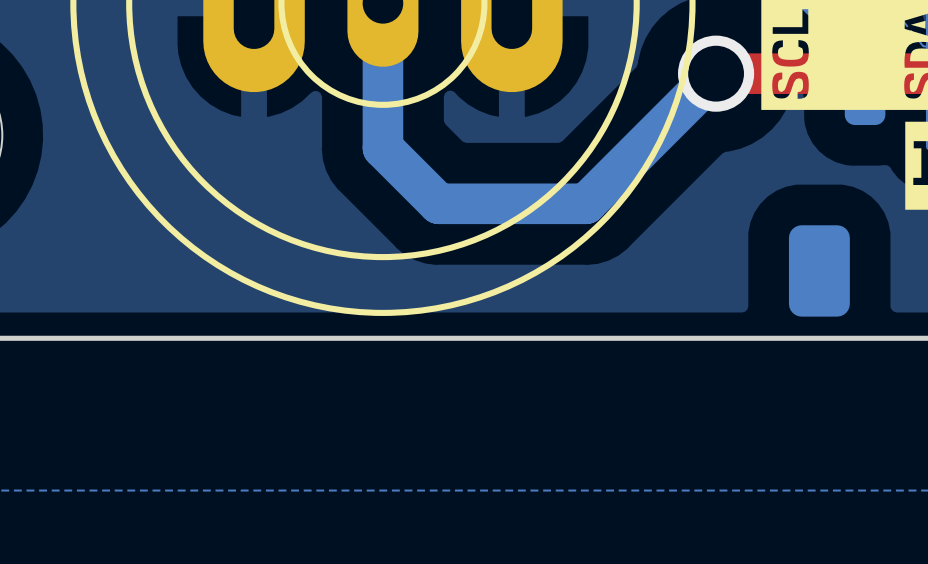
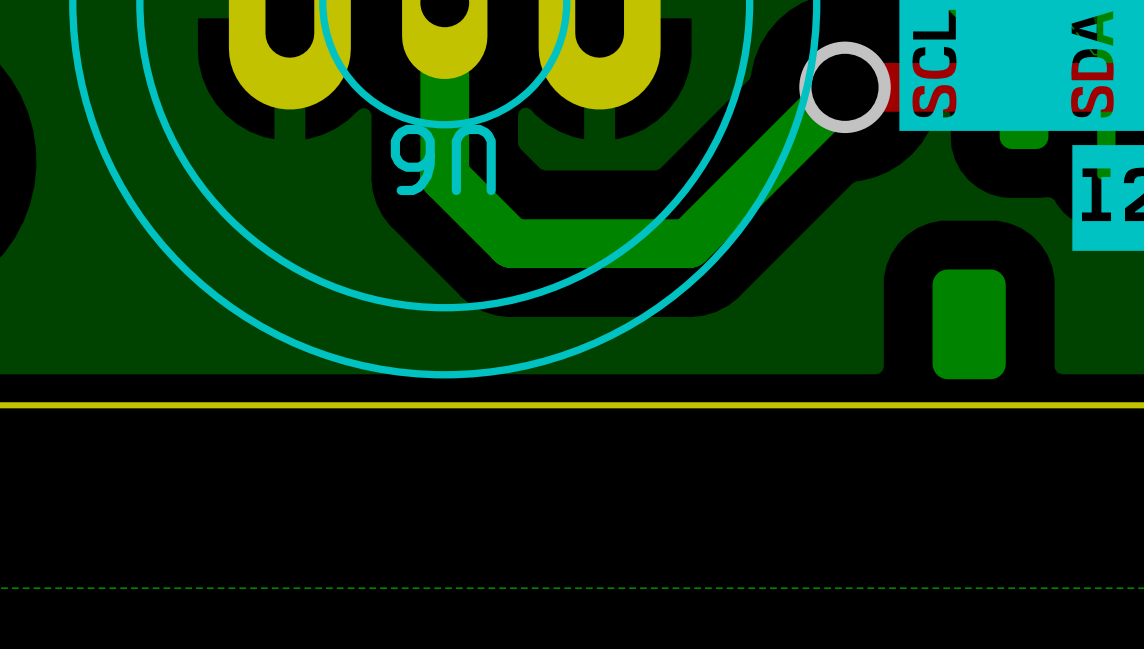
U6 name: none -> U6 (443, 159)

